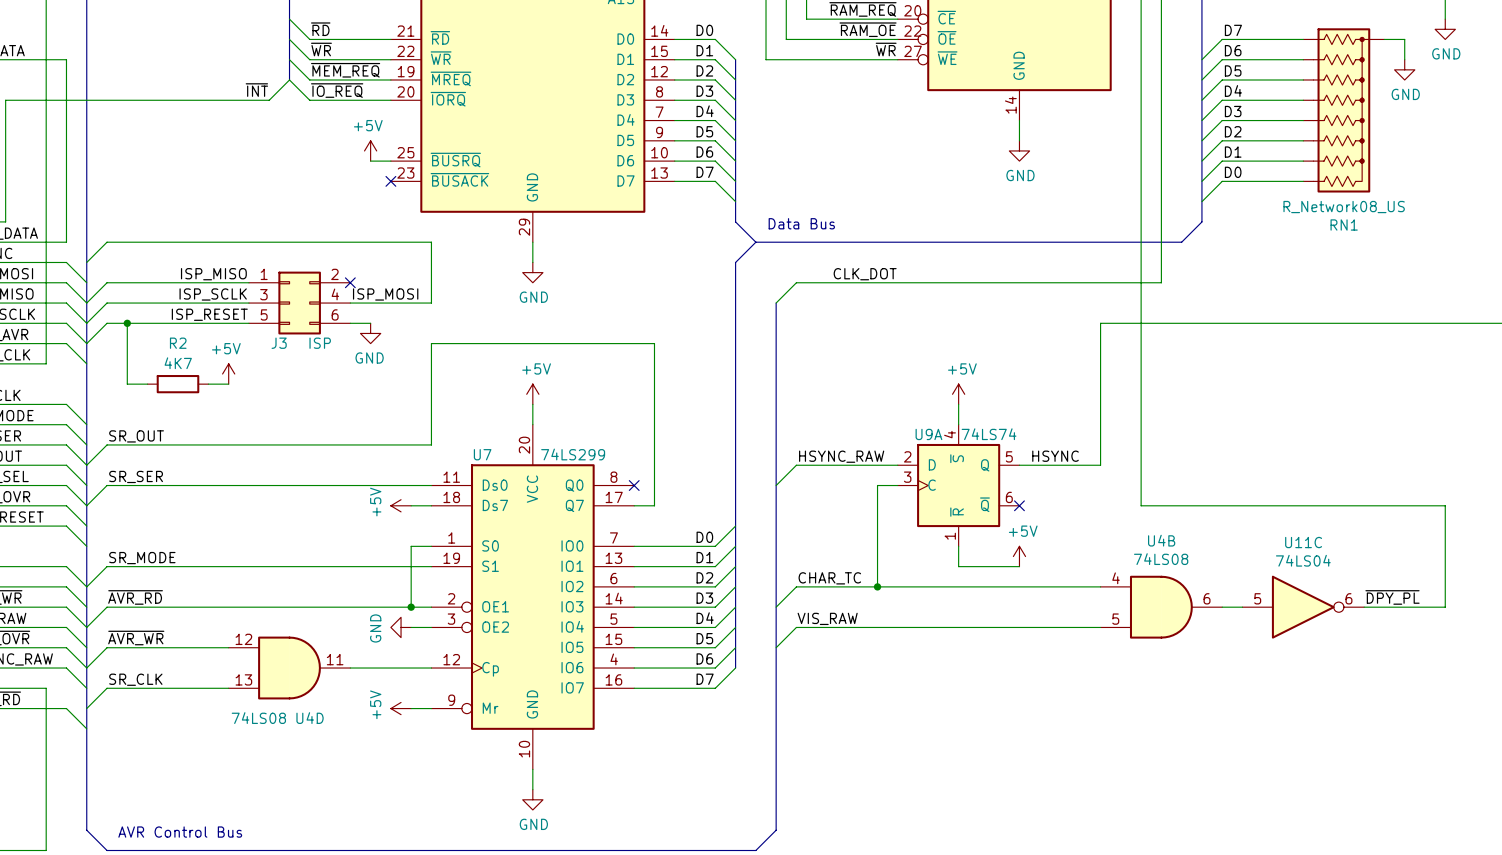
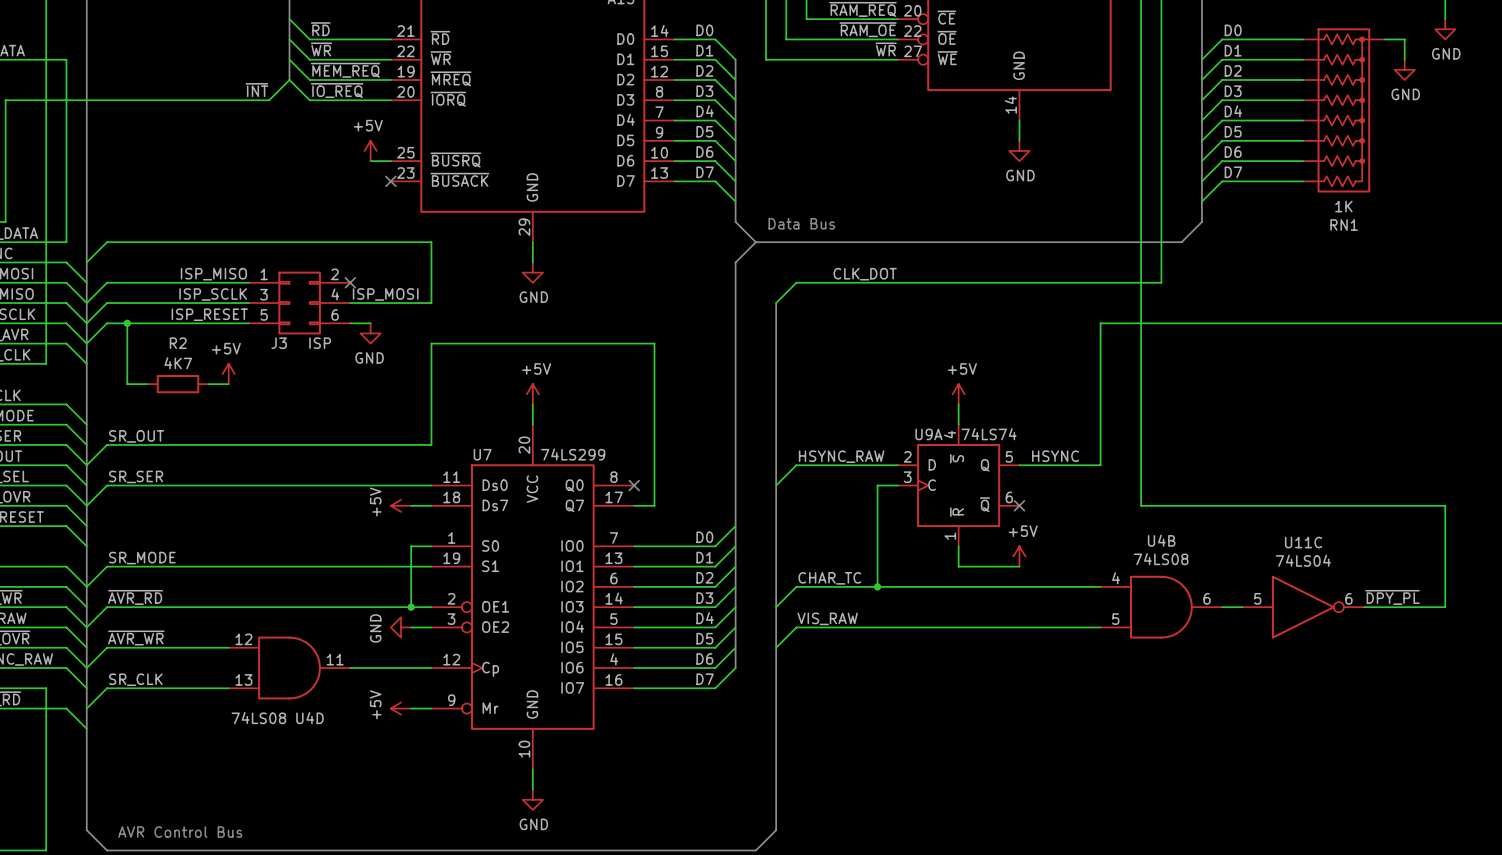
label: D7 (1233, 30) -> D0 (1233, 30)
label: D6 (1233, 50) -> D1 (1233, 50)
label: D5 (1233, 70) -> D2 (1233, 70)
label: D4 (1233, 90) -> D3 (1233, 91)
label: D3 (1233, 111) -> D4 (1233, 111)
label: D2 (1233, 131) -> D5 (1233, 131)
label: D1 (1233, 152) -> D6 (1233, 152)
label: D0 (1233, 172) -> D7 (1233, 172)
RN1 value: R_Network08_US (1344, 207) -> 1K (1343, 206)

